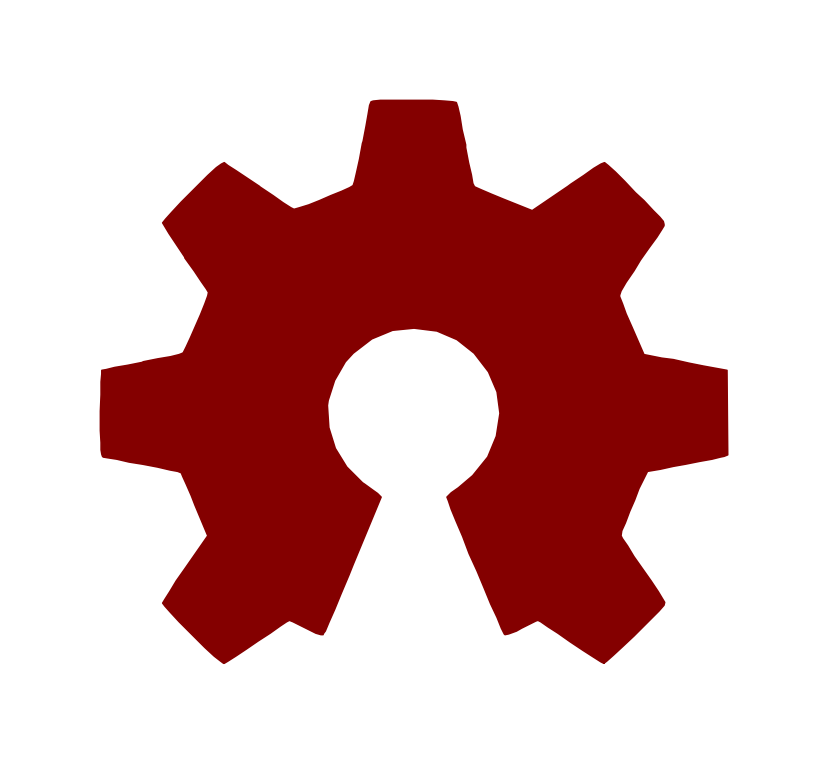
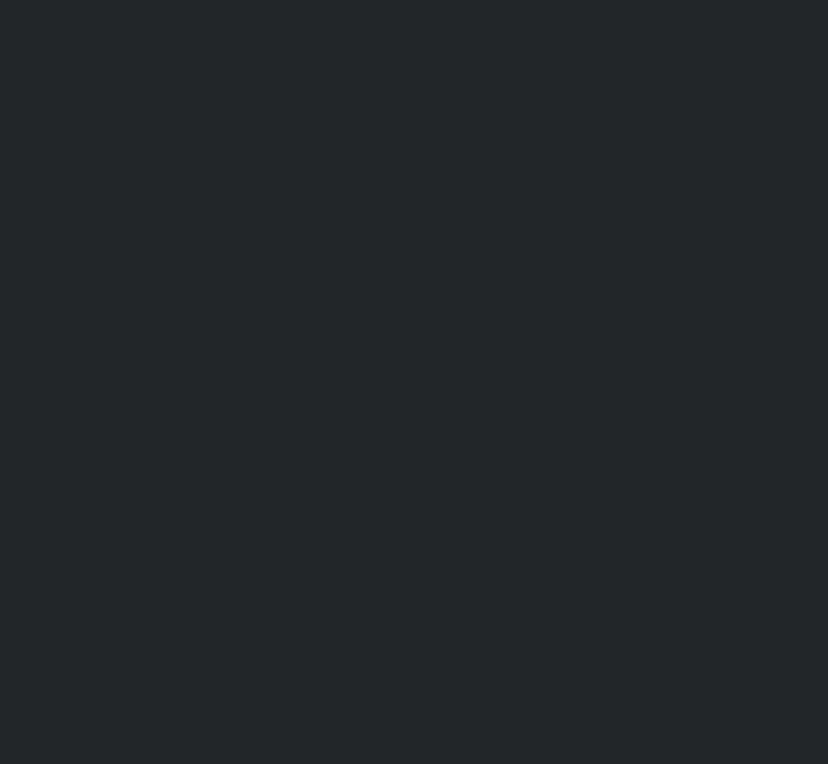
part: (414, 381) -> none

